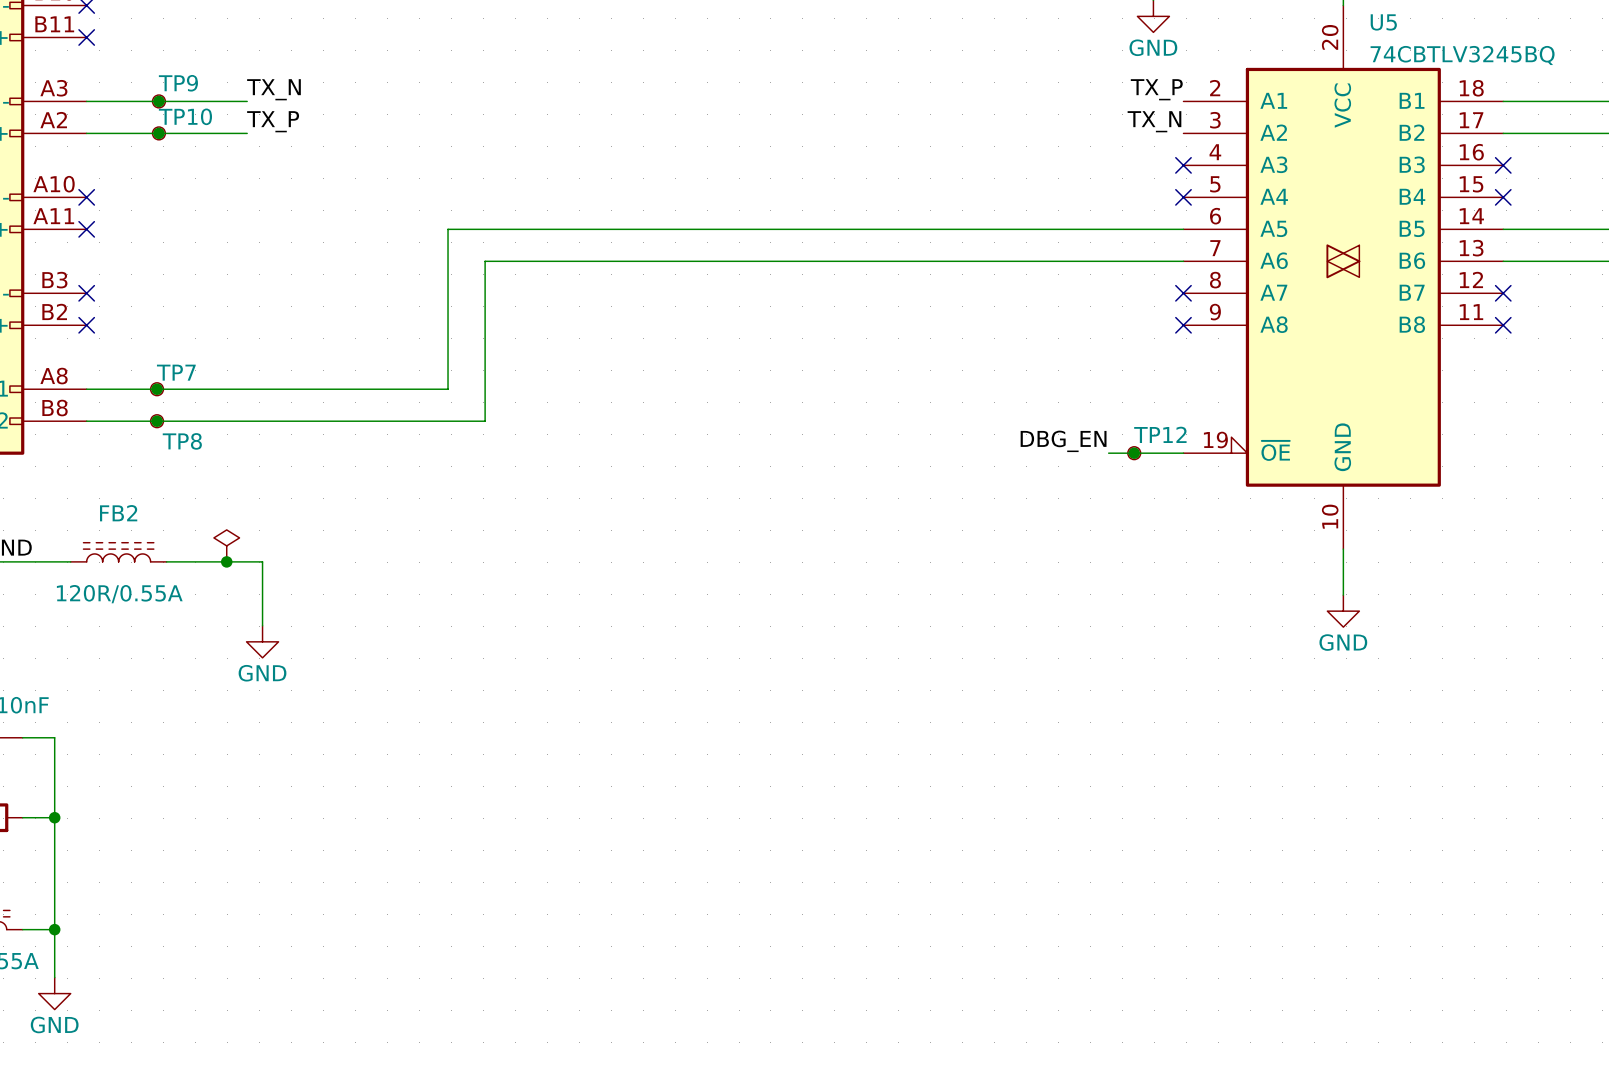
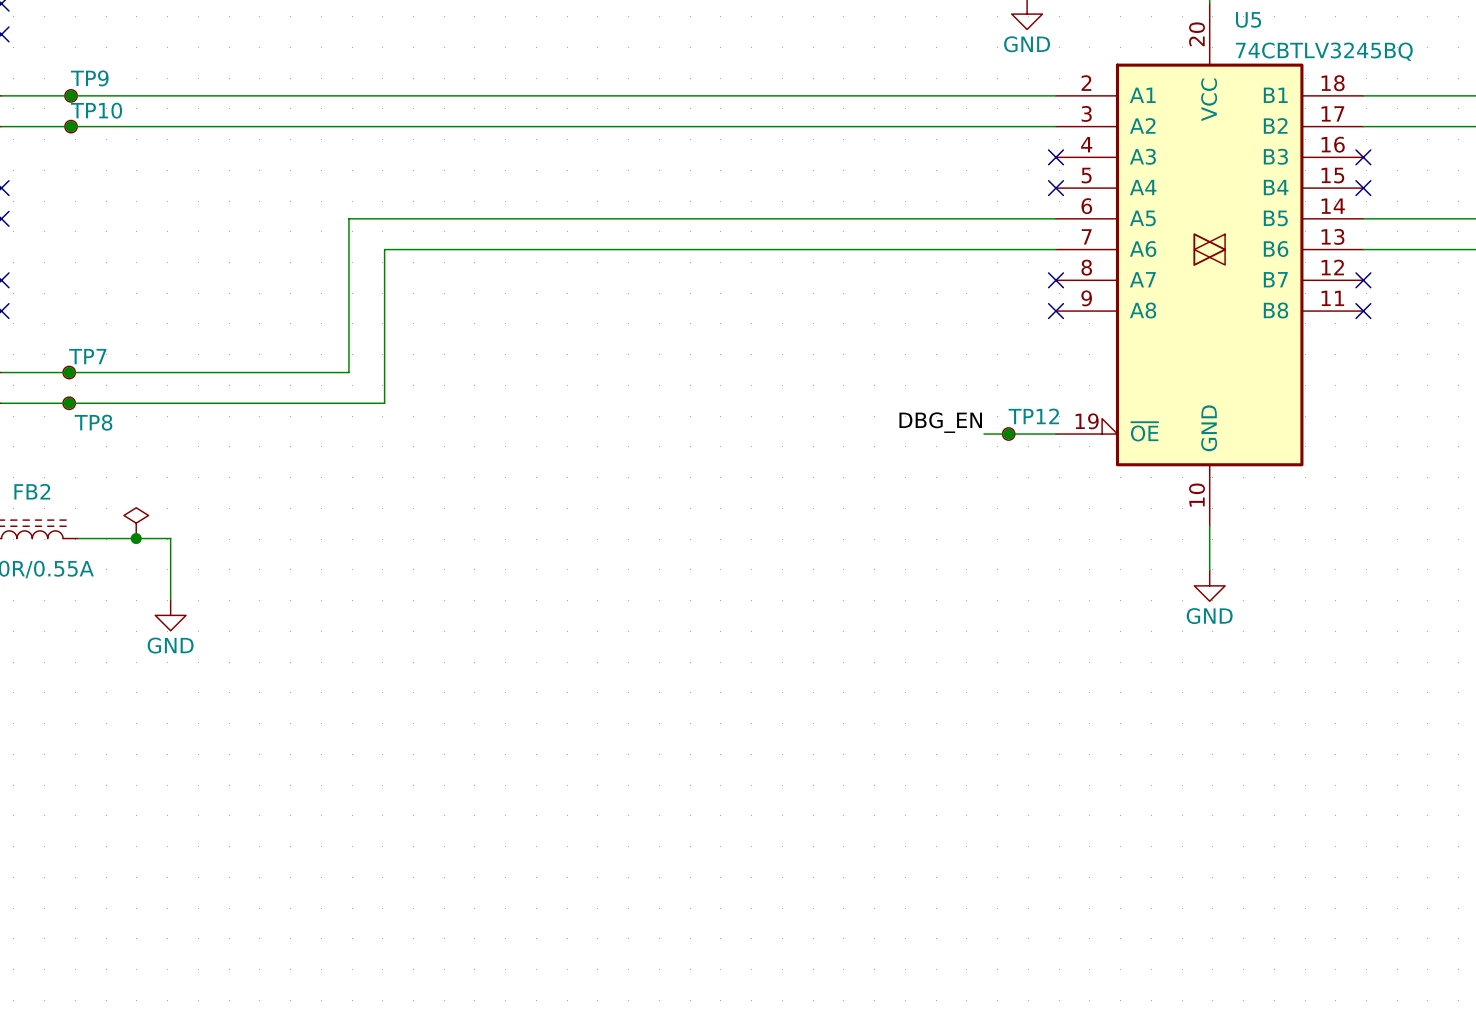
label: TX_N (273, 89) -> none
label: TX_P (1156, 89) -> none
wire: none -> (155, 95) (1055, 95)
label: TX_P (273, 121) -> none
label: TX_N (1154, 121) -> none
wire: none -> (155, 126) (1055, 126)

